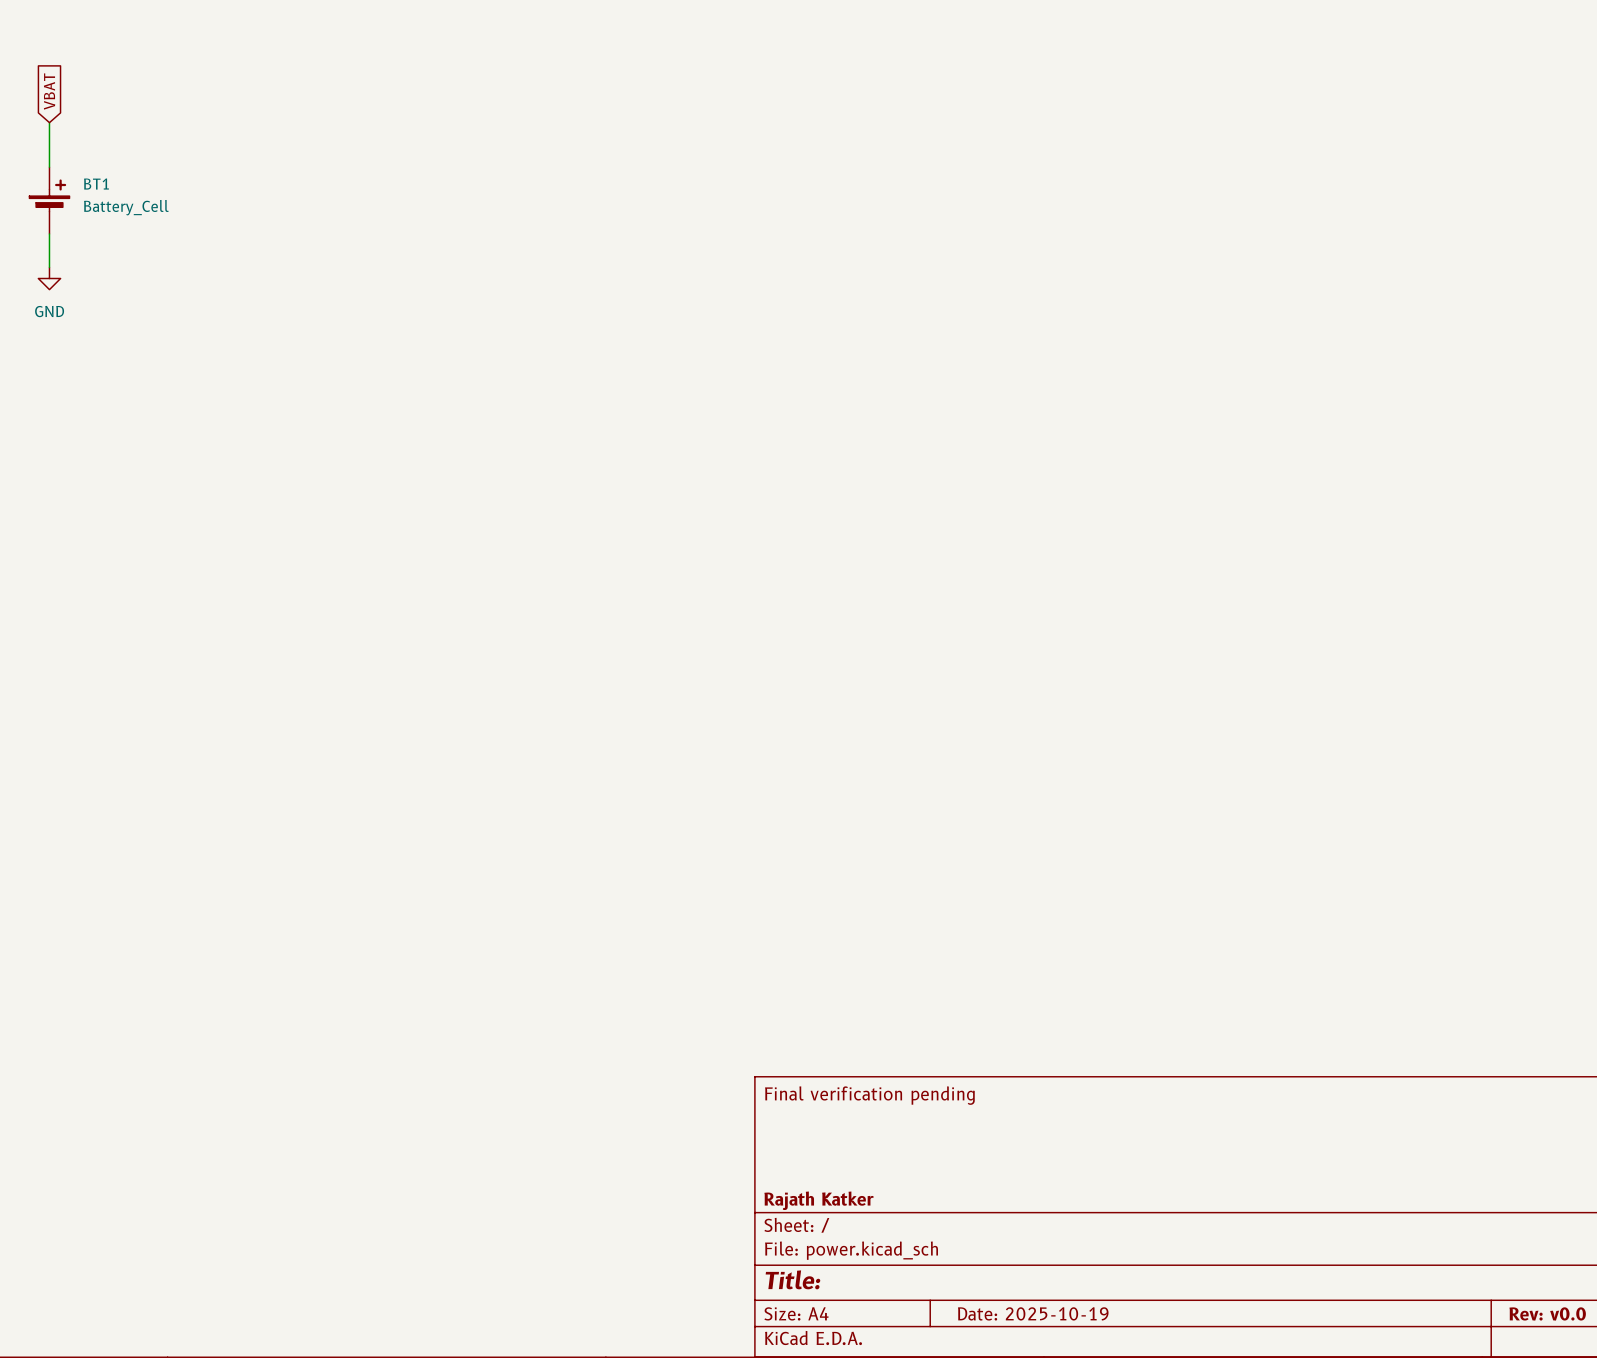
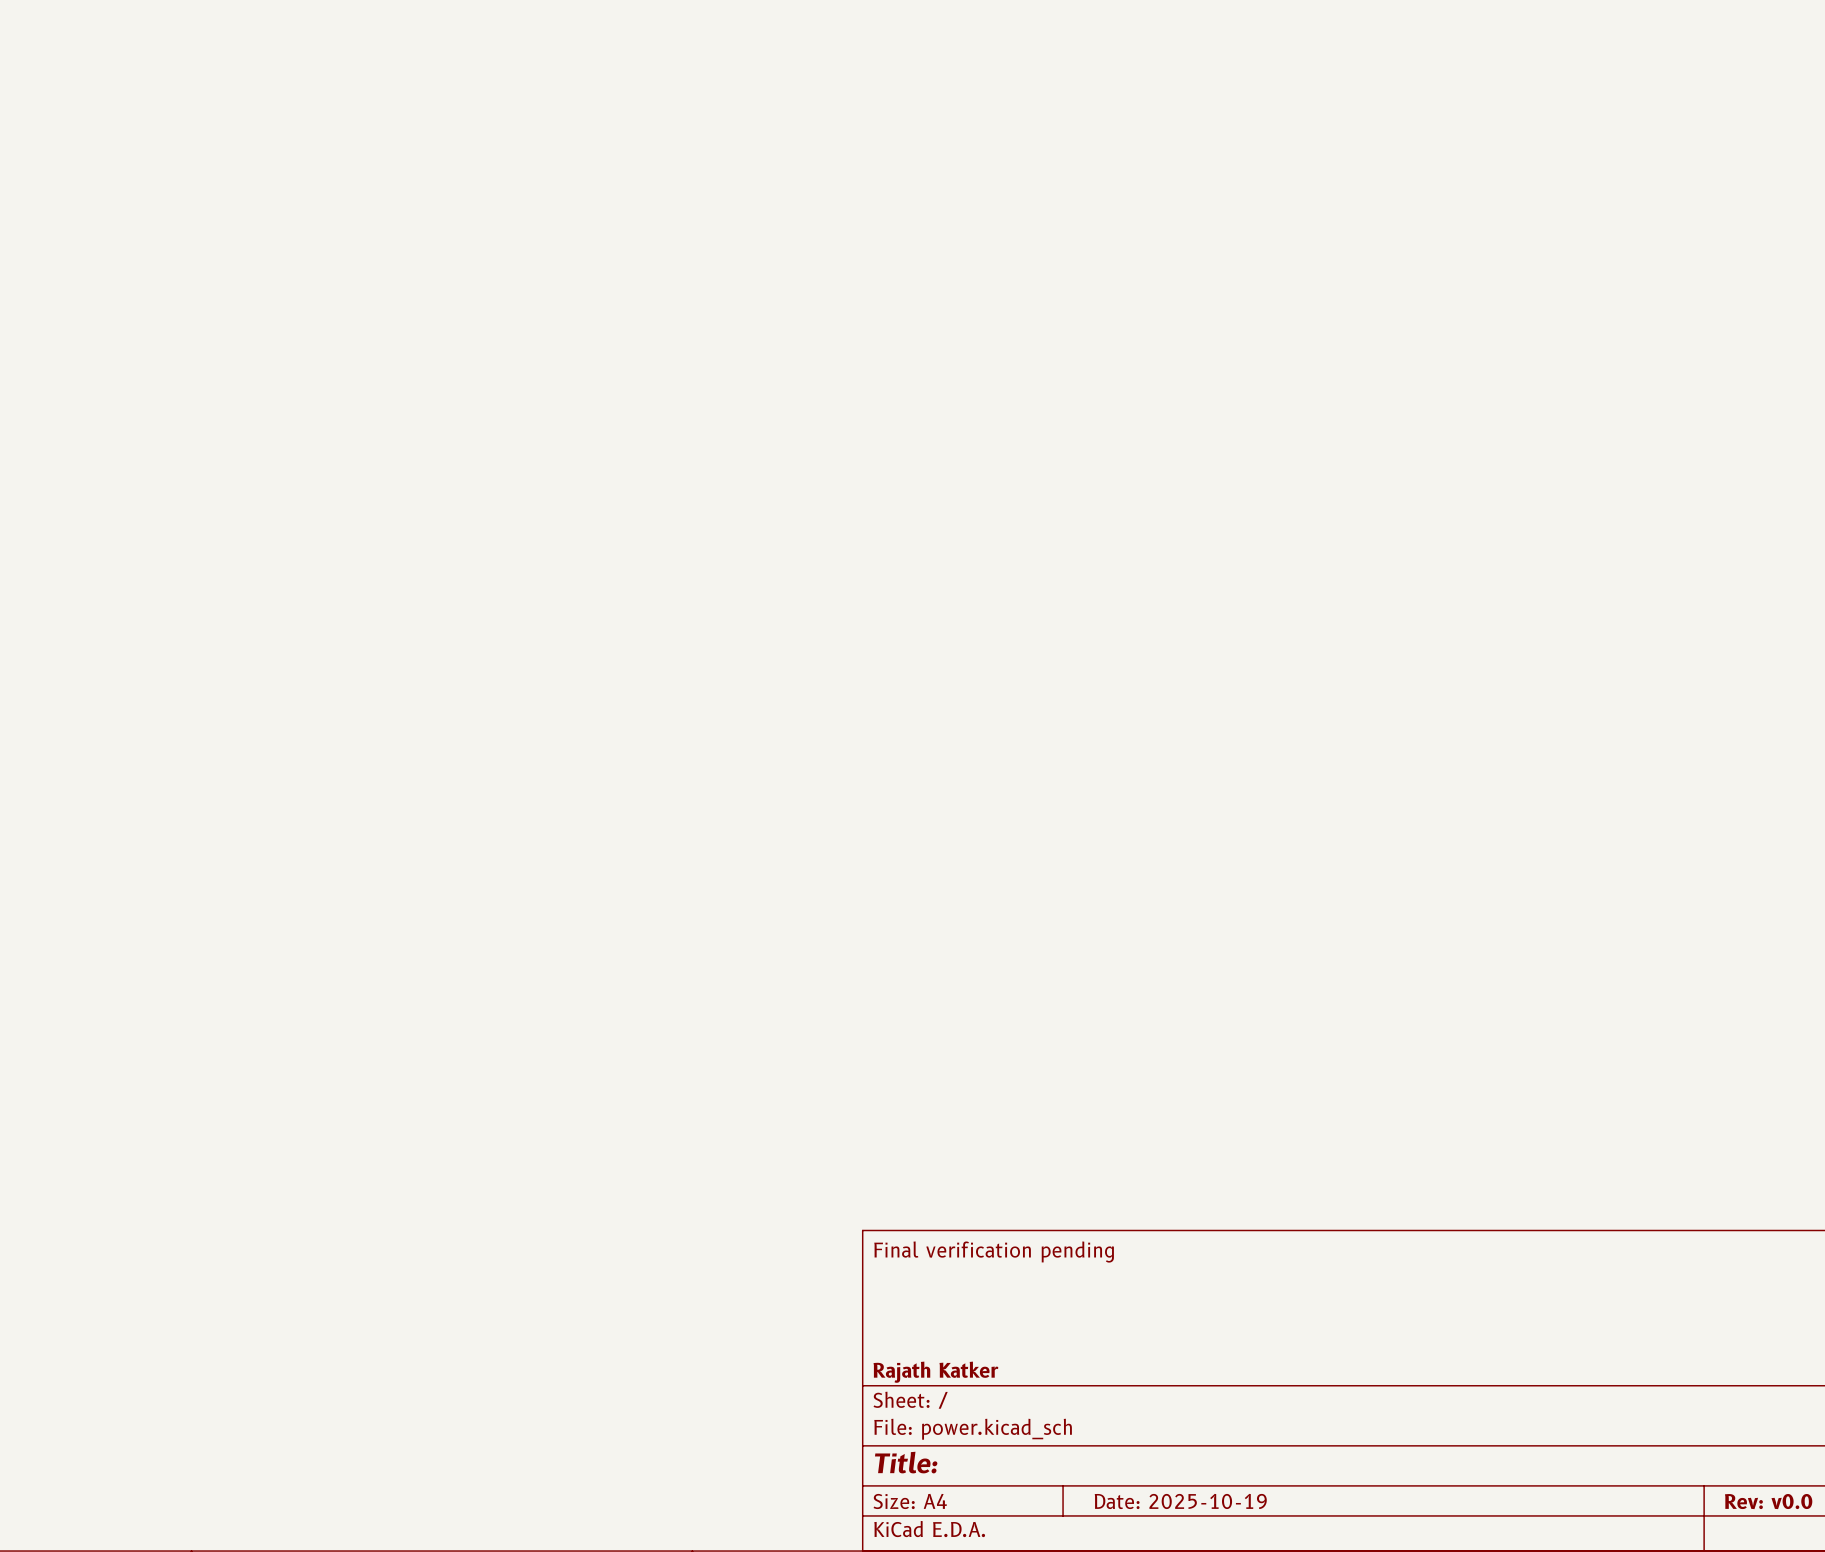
global label: VBAT (49, 91) -> none
wire: (49, 122) (49, 167) -> none
BT1: Battery_Cell (49, 200) -> none
wire: (49, 233) (49, 267) -> none
power symbol: GND (49, 278) -> none

